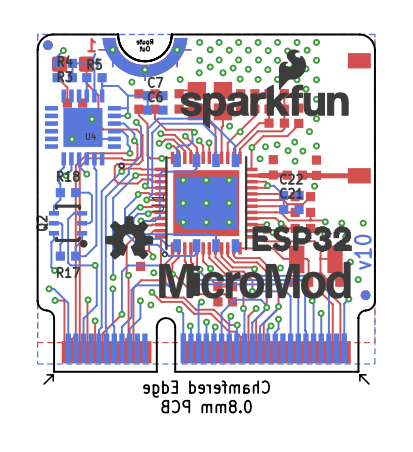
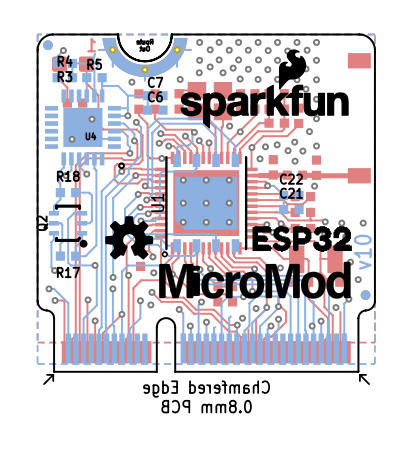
top track: (324, 287) (340, 303) (340, 311) -> (324, 287) (324, 307) (332, 315)
top track: (308, 289) (312, 293) (322, 293) (332, 304) (332, 315) -> (308, 289) (308, 298) (328, 318) (328, 336) (325, 339) (325, 352)
bottom track: (173, 290) (168, 285) (136, 285) (131, 290) (131, 317) (121, 326) -> (121, 314) (121, 326)
top track: (243, 296) (243, 308) -> none
via: none -> (243, 296)
via: (312, 300) -> none
top track: (278, 304) (278, 308) (263, 323) (263, 339) -> (278, 304) (286, 311) (286, 322) (271, 336) (266, 336) (263, 339)
bottom track: (266, 305) (260, 299) (234, 299) (221, 312) -> (243, 296) (227, 296) (221, 303) (221, 312)
via: none -> (335, 307)
bottom track: (243, 308) (244, 348) -> (278, 306) (278, 296) (256, 296) (249, 303) (249, 325) (244, 330) (244, 348)
via: (243, 308) -> none
top track: (256, 308) (248, 316) (248, 329) -> none
bottom track: (321, 313) (321, 321) -> none
via: (321, 313) -> none
via: (230, 316) -> none
via: none -> (242, 318)
via: none -> (321, 321)
via: none -> (312, 326)
via: (215, 327) -> none

